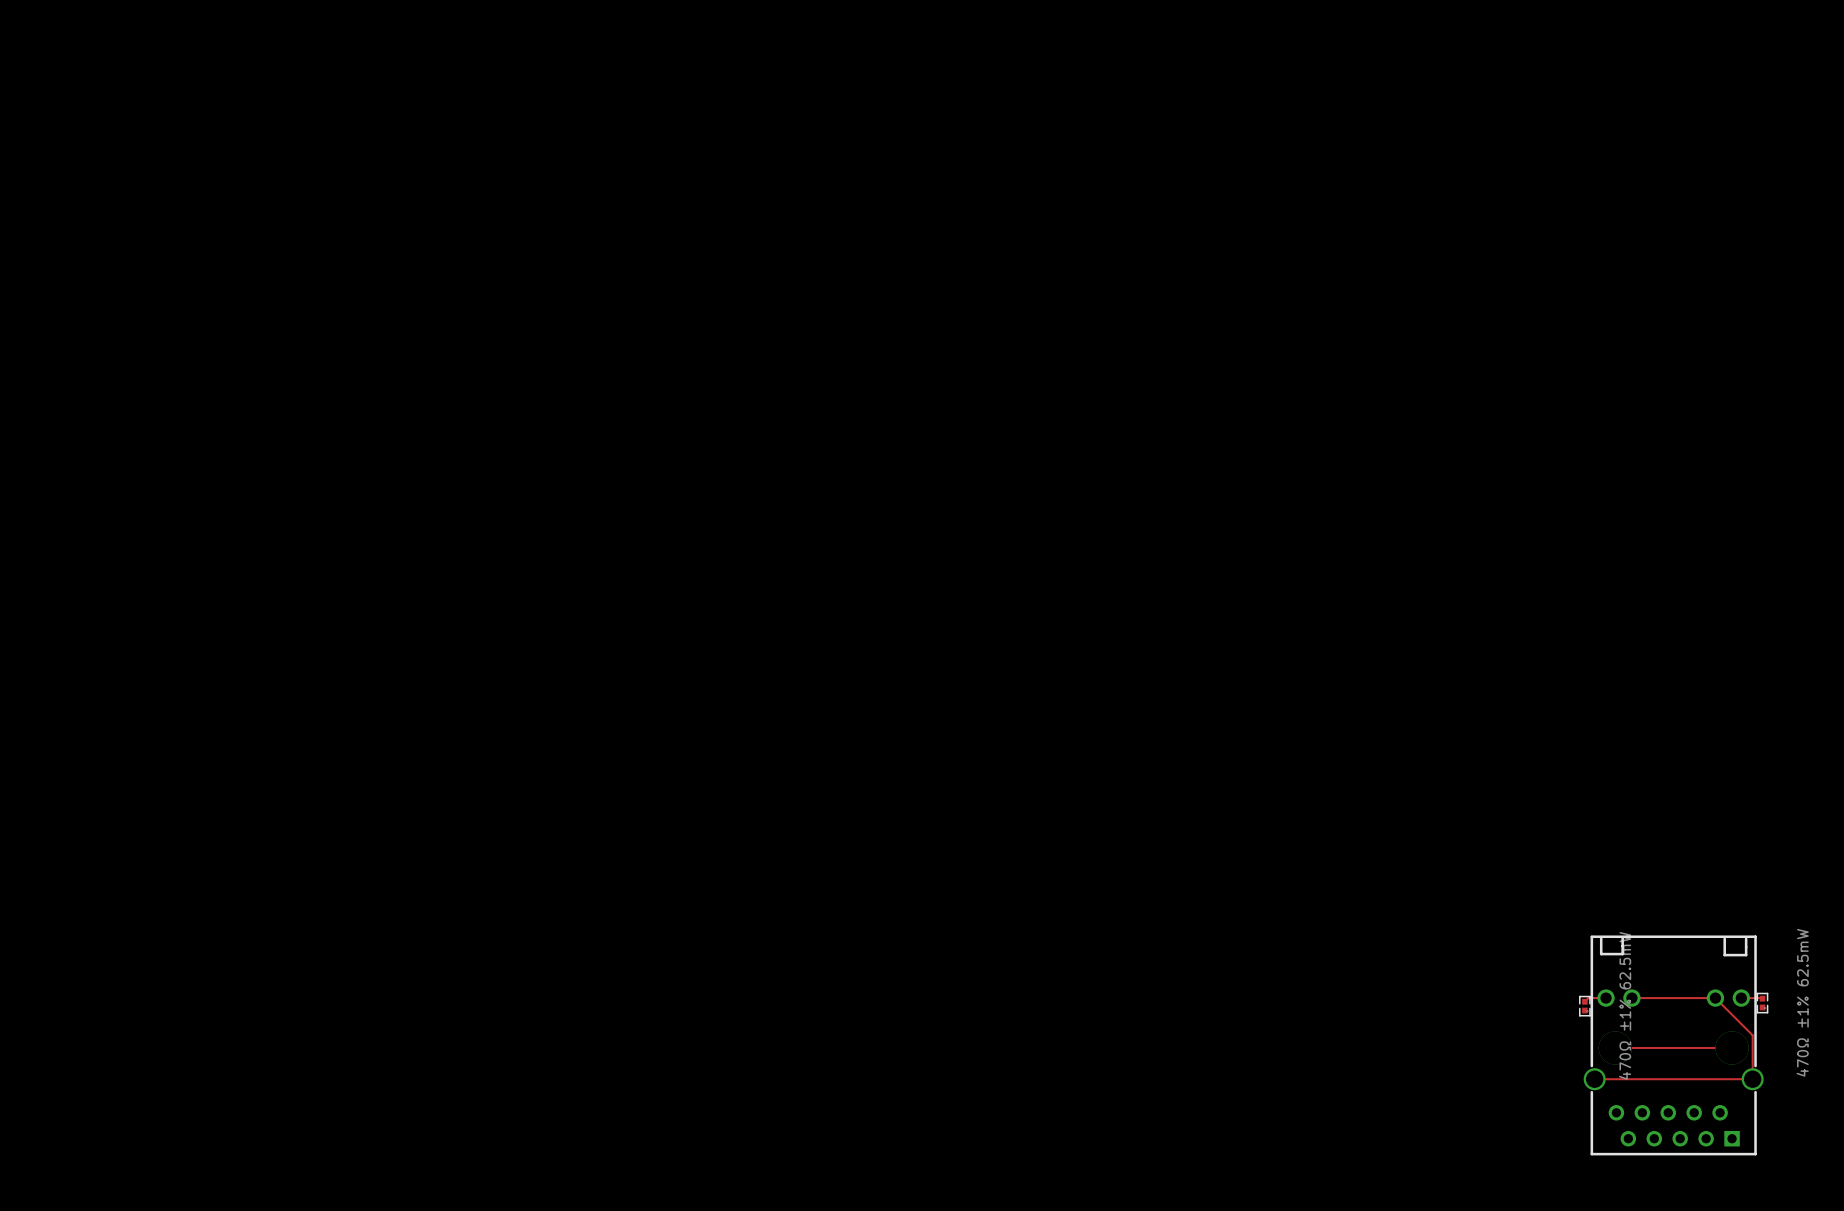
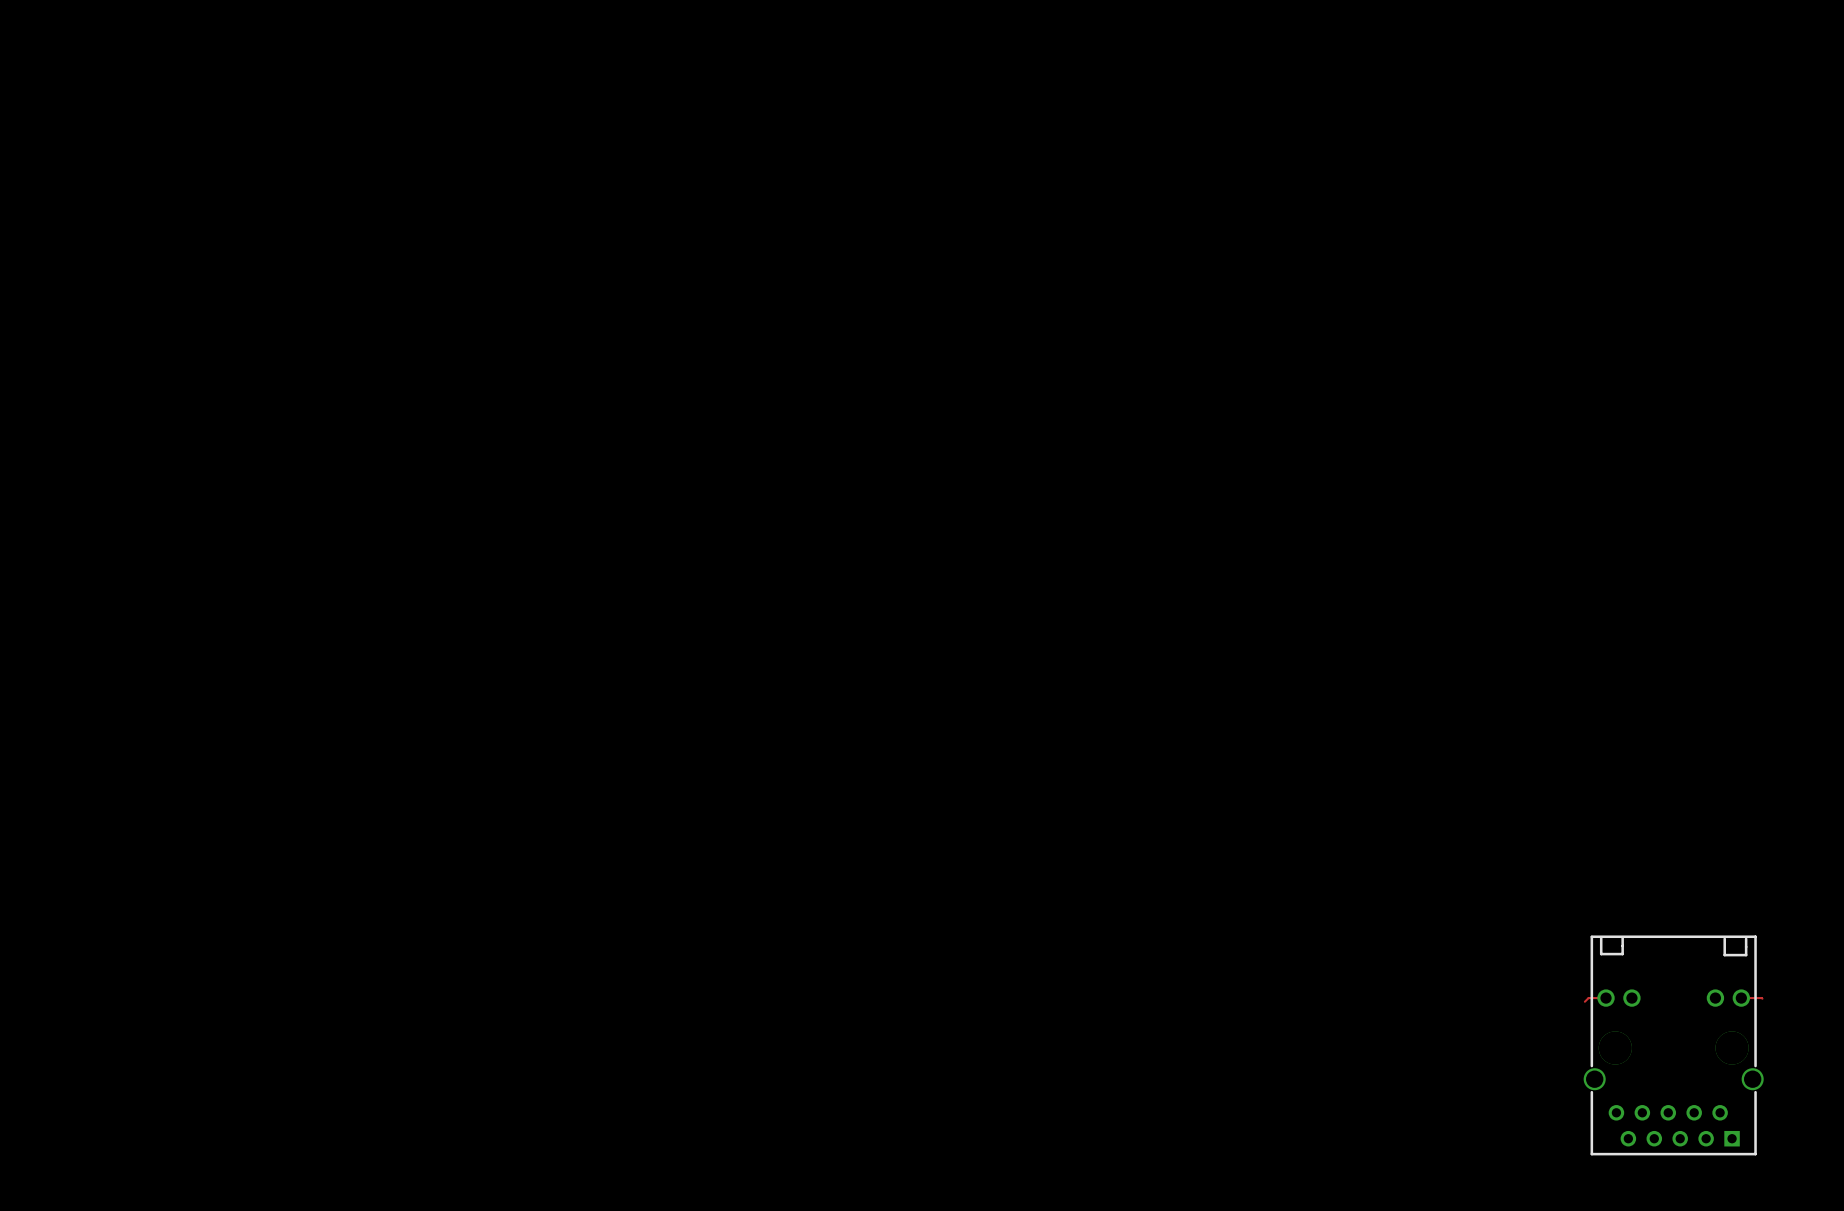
top track: (1631, 998) (1715, 998) (1752, 1035) (1752, 1079) (1594, 1079) -> none
part: 470Ω ±1% 62.5mW (1762, 1003) -> none
part: 470Ω ±1% 62.5mW (1584, 1006) -> none
top track: (1615, 1047) (1732, 1047) -> none

